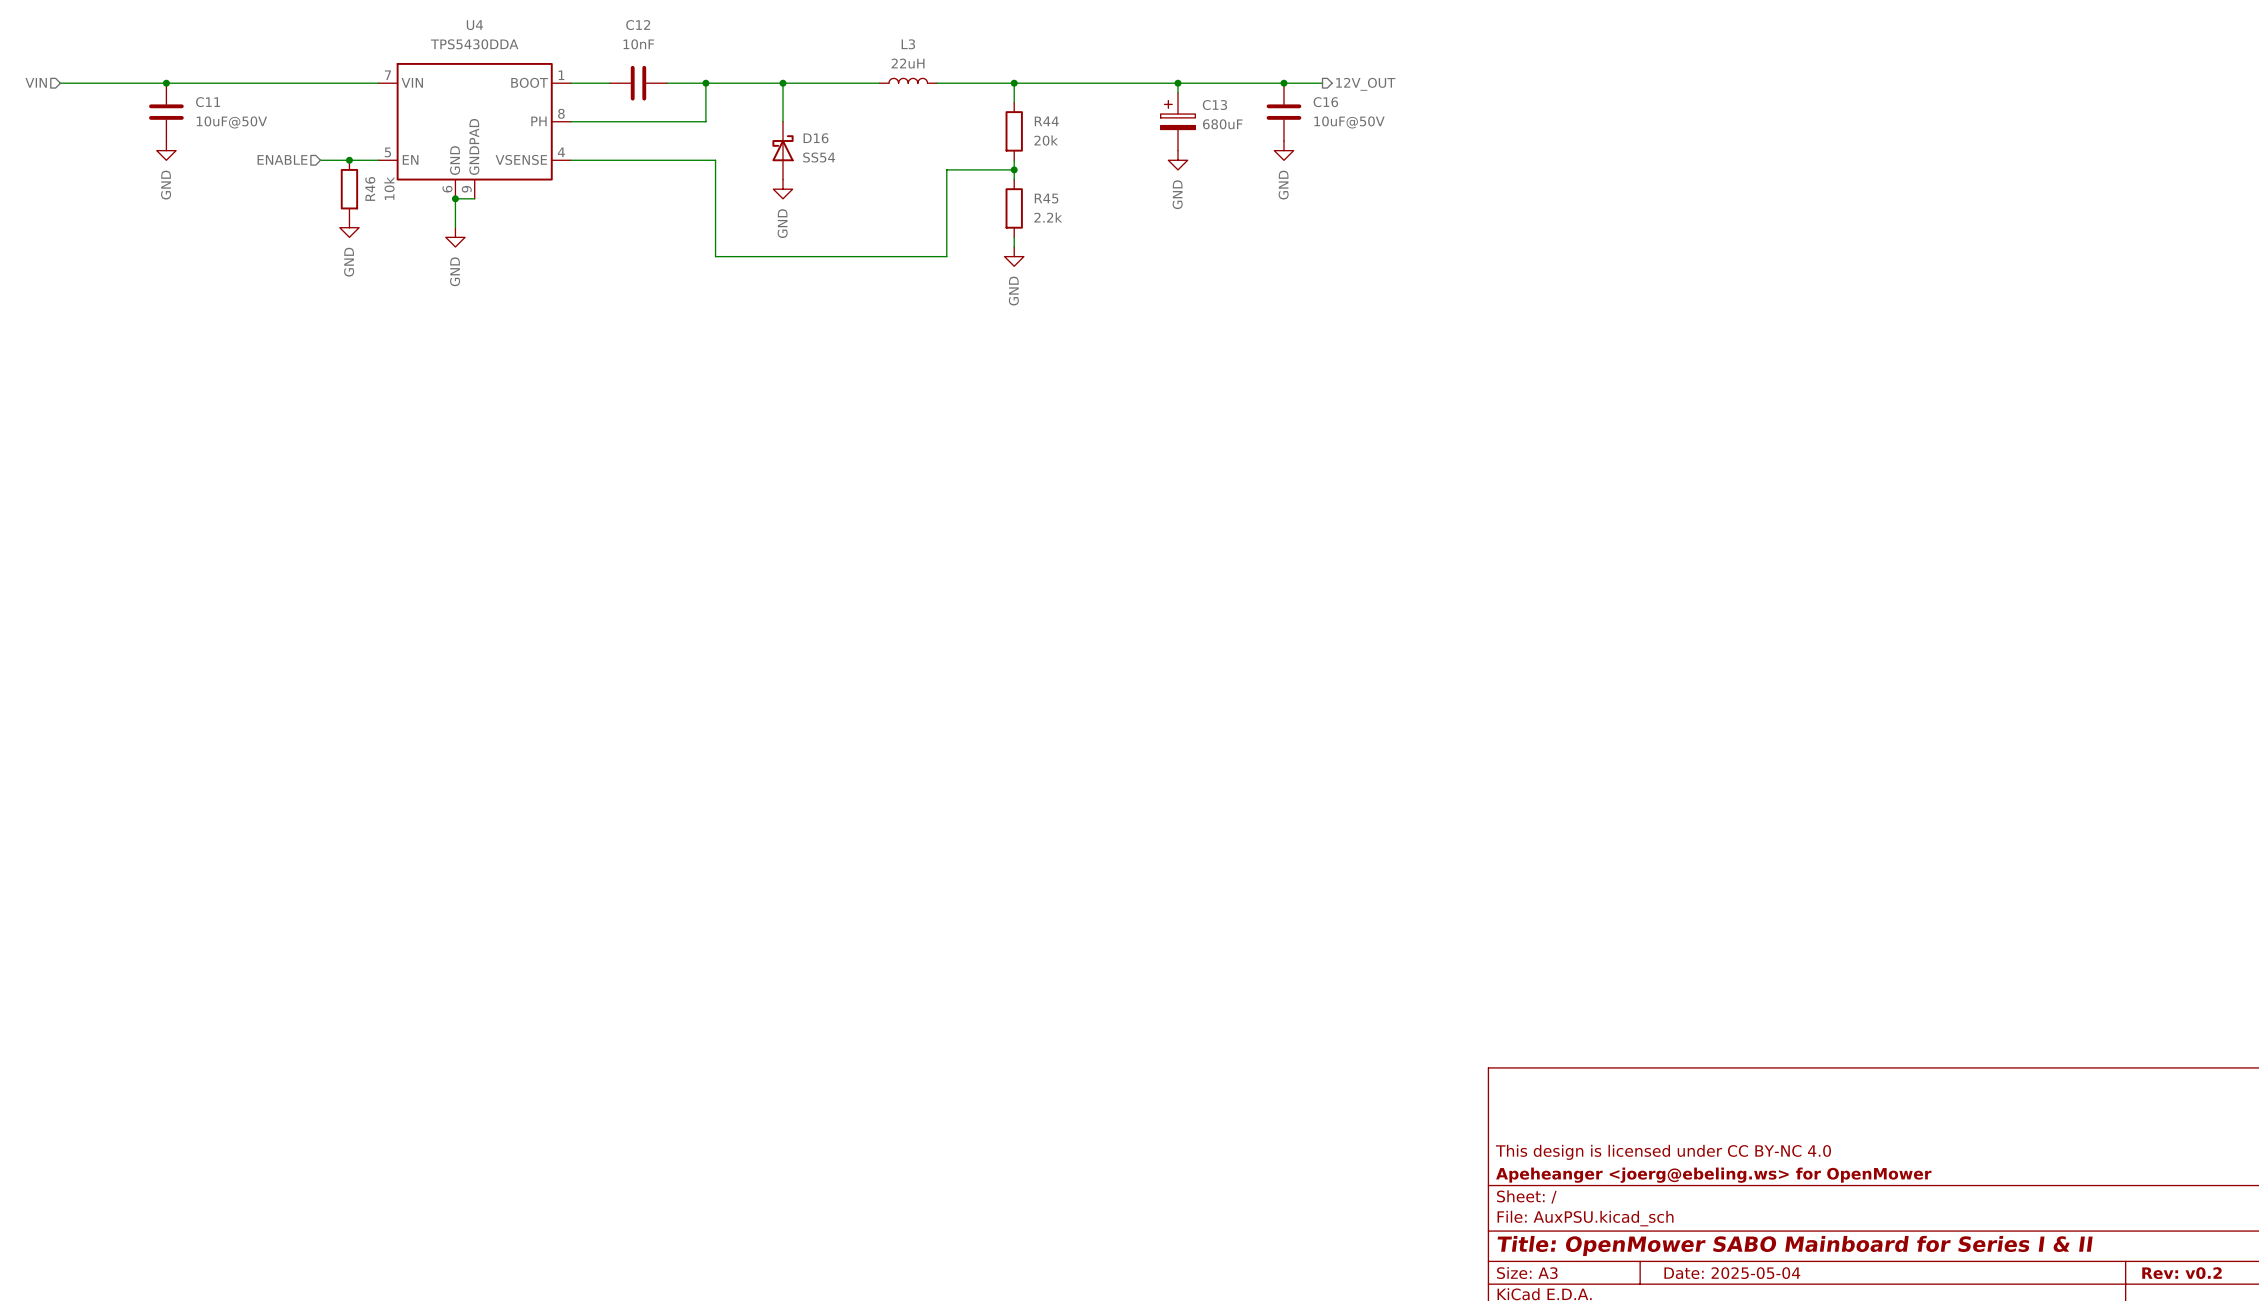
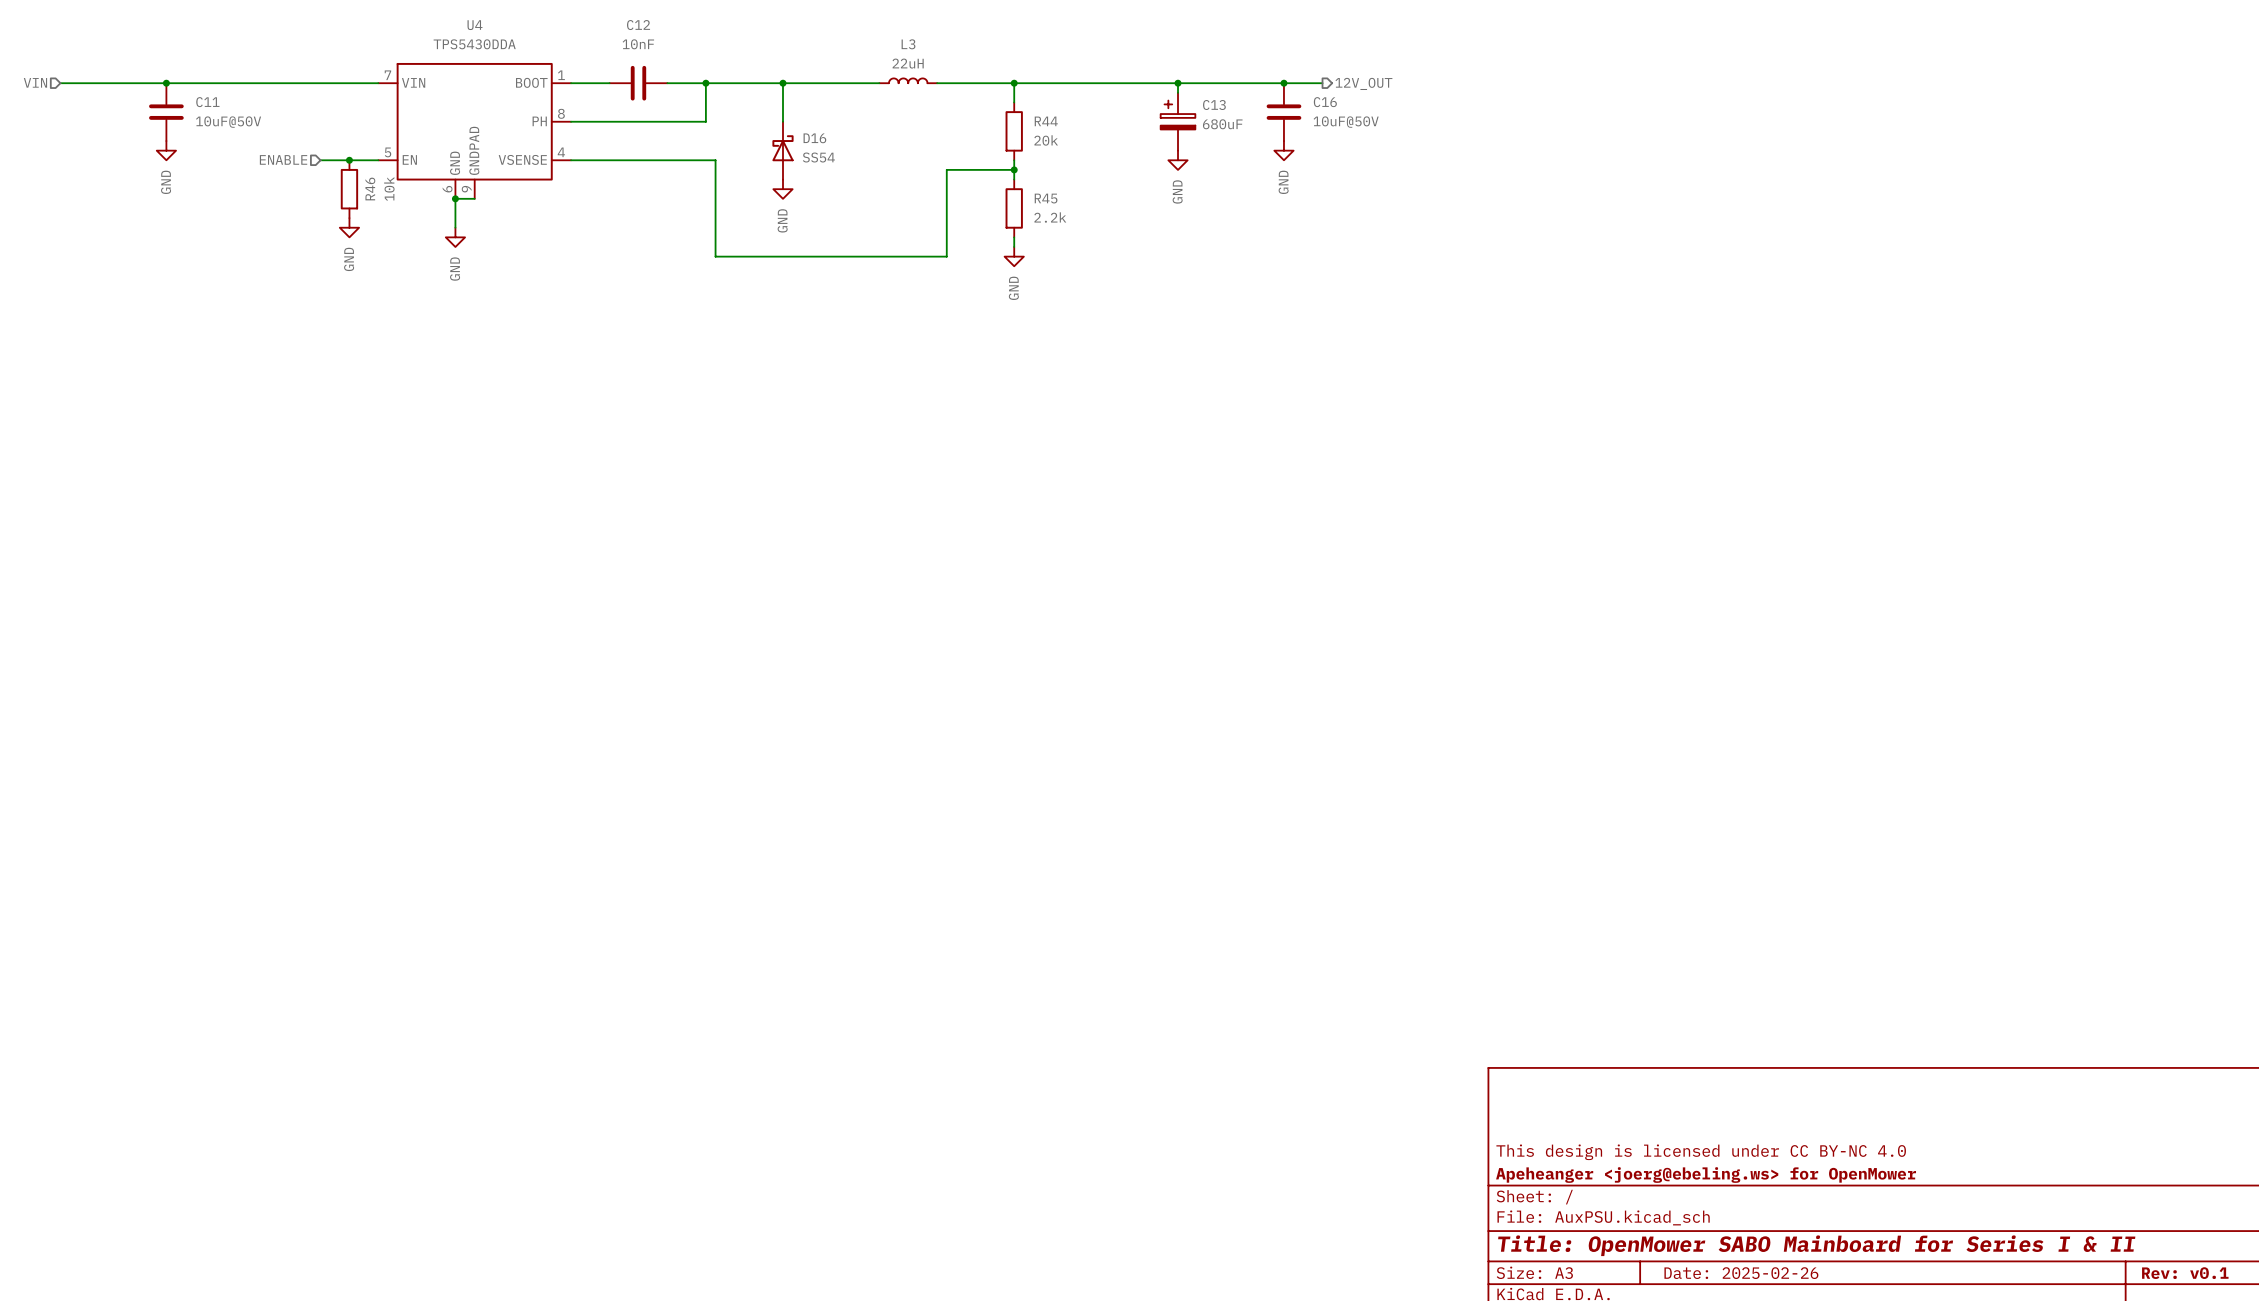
title block: Date: 2025-05-04 (1732, 1273) -> Date: 2025-02-26 (1741, 1273)
title block: Rev: v0.2 (2182, 1273) -> Rev: v0.1 (2185, 1273)

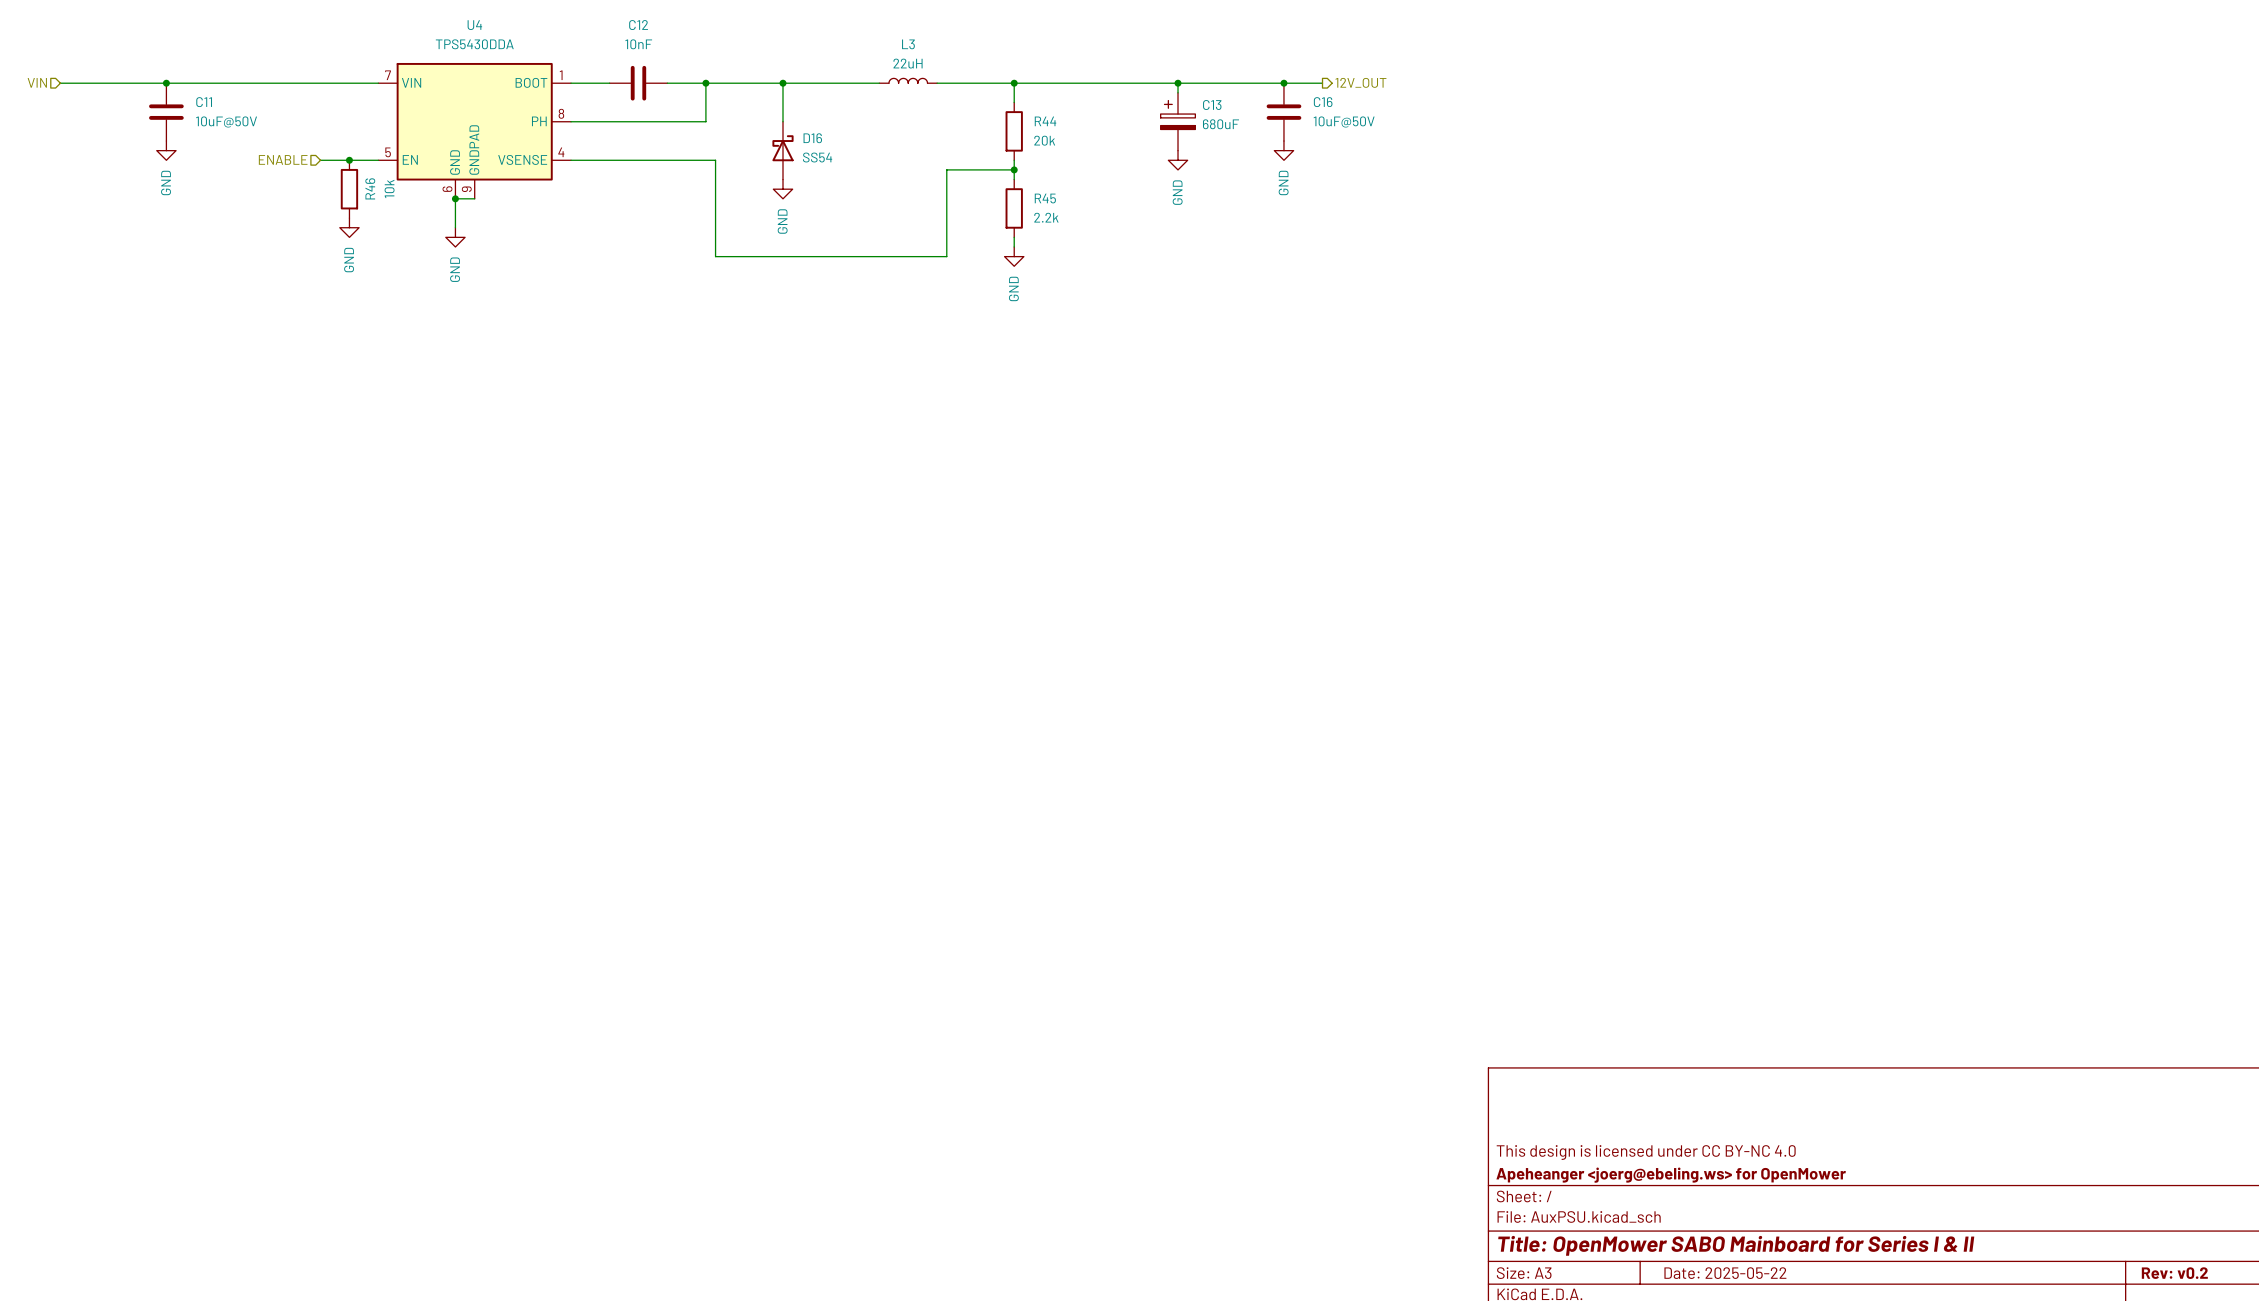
title block: Date: 2025-02-26 (1741, 1273) -> Date: 2025-05-22 (1725, 1273)
title block: Rev: v0.1 (2185, 1273) -> Rev: v0.2 (2174, 1273)

